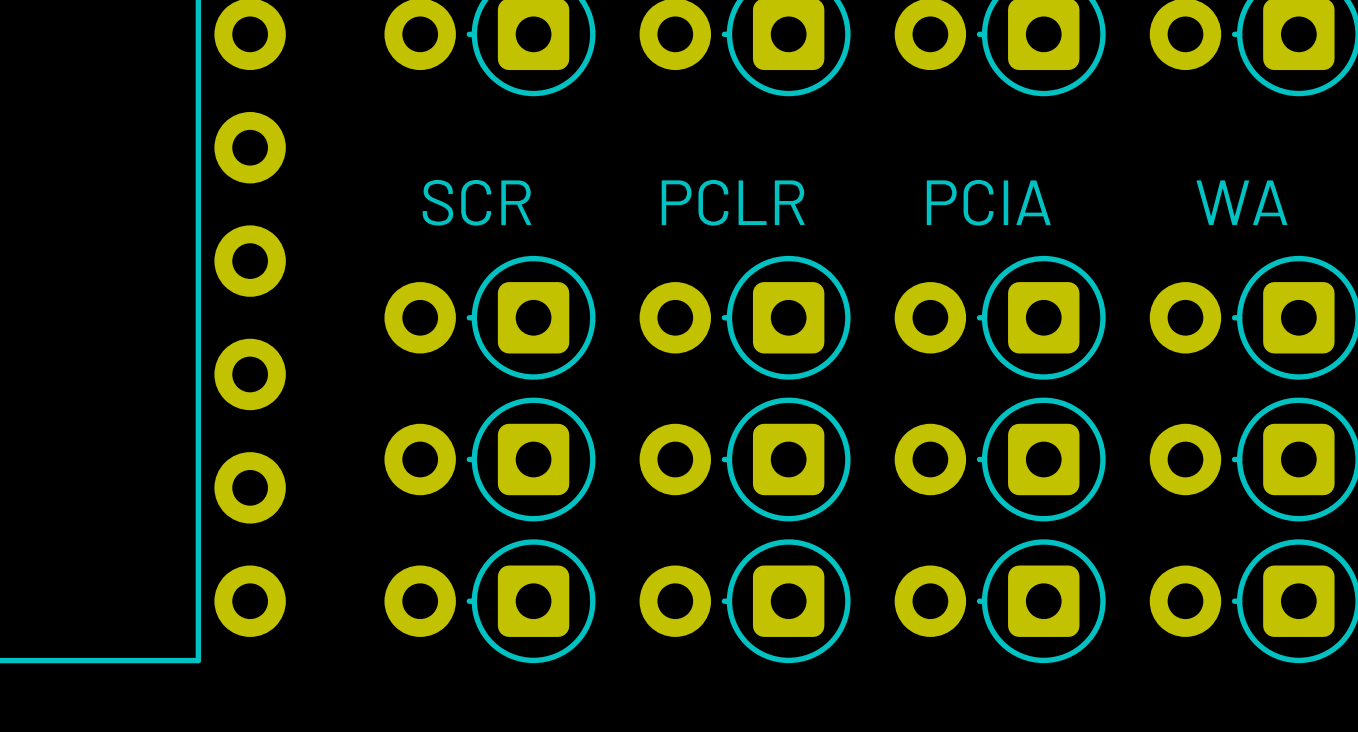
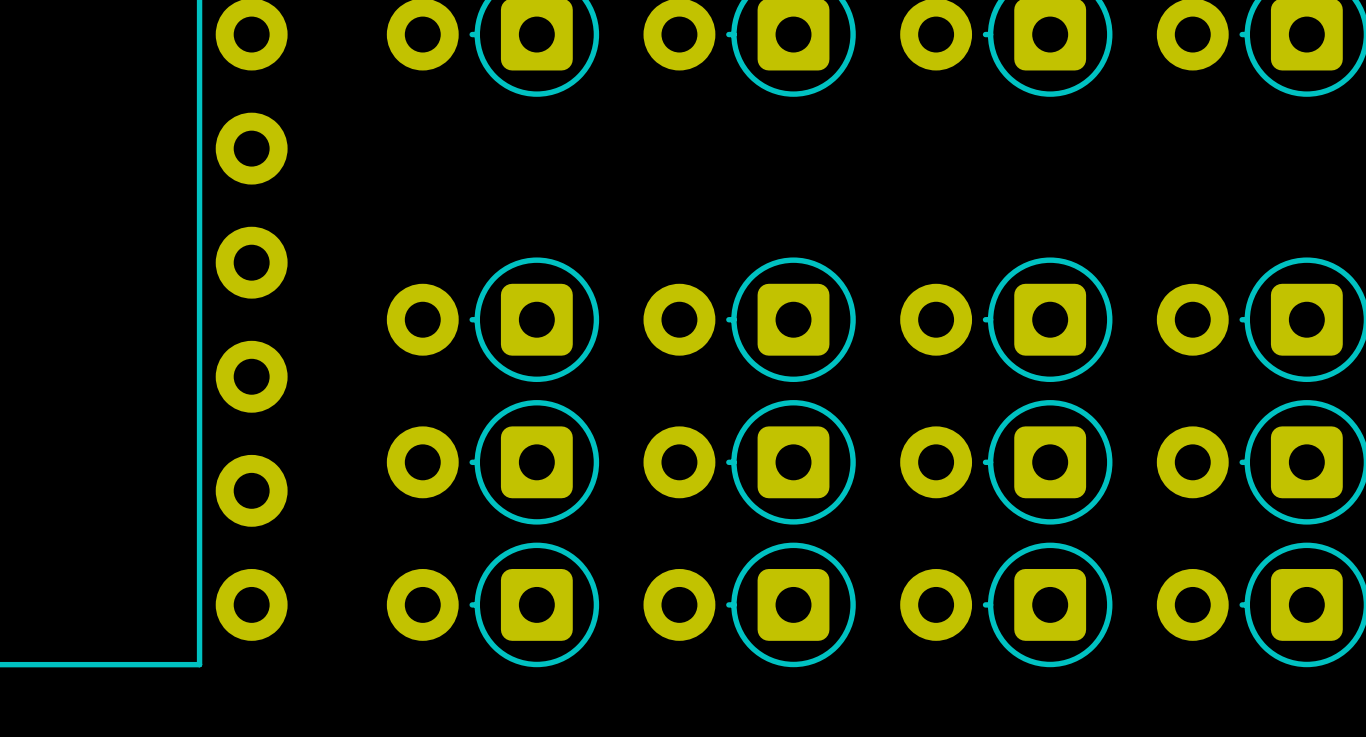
text: SCR (476, 202) -> none
text: PCLR (733, 202) -> none
text: PCIA (988, 202) -> none
text: WA (1241, 202) -> none

